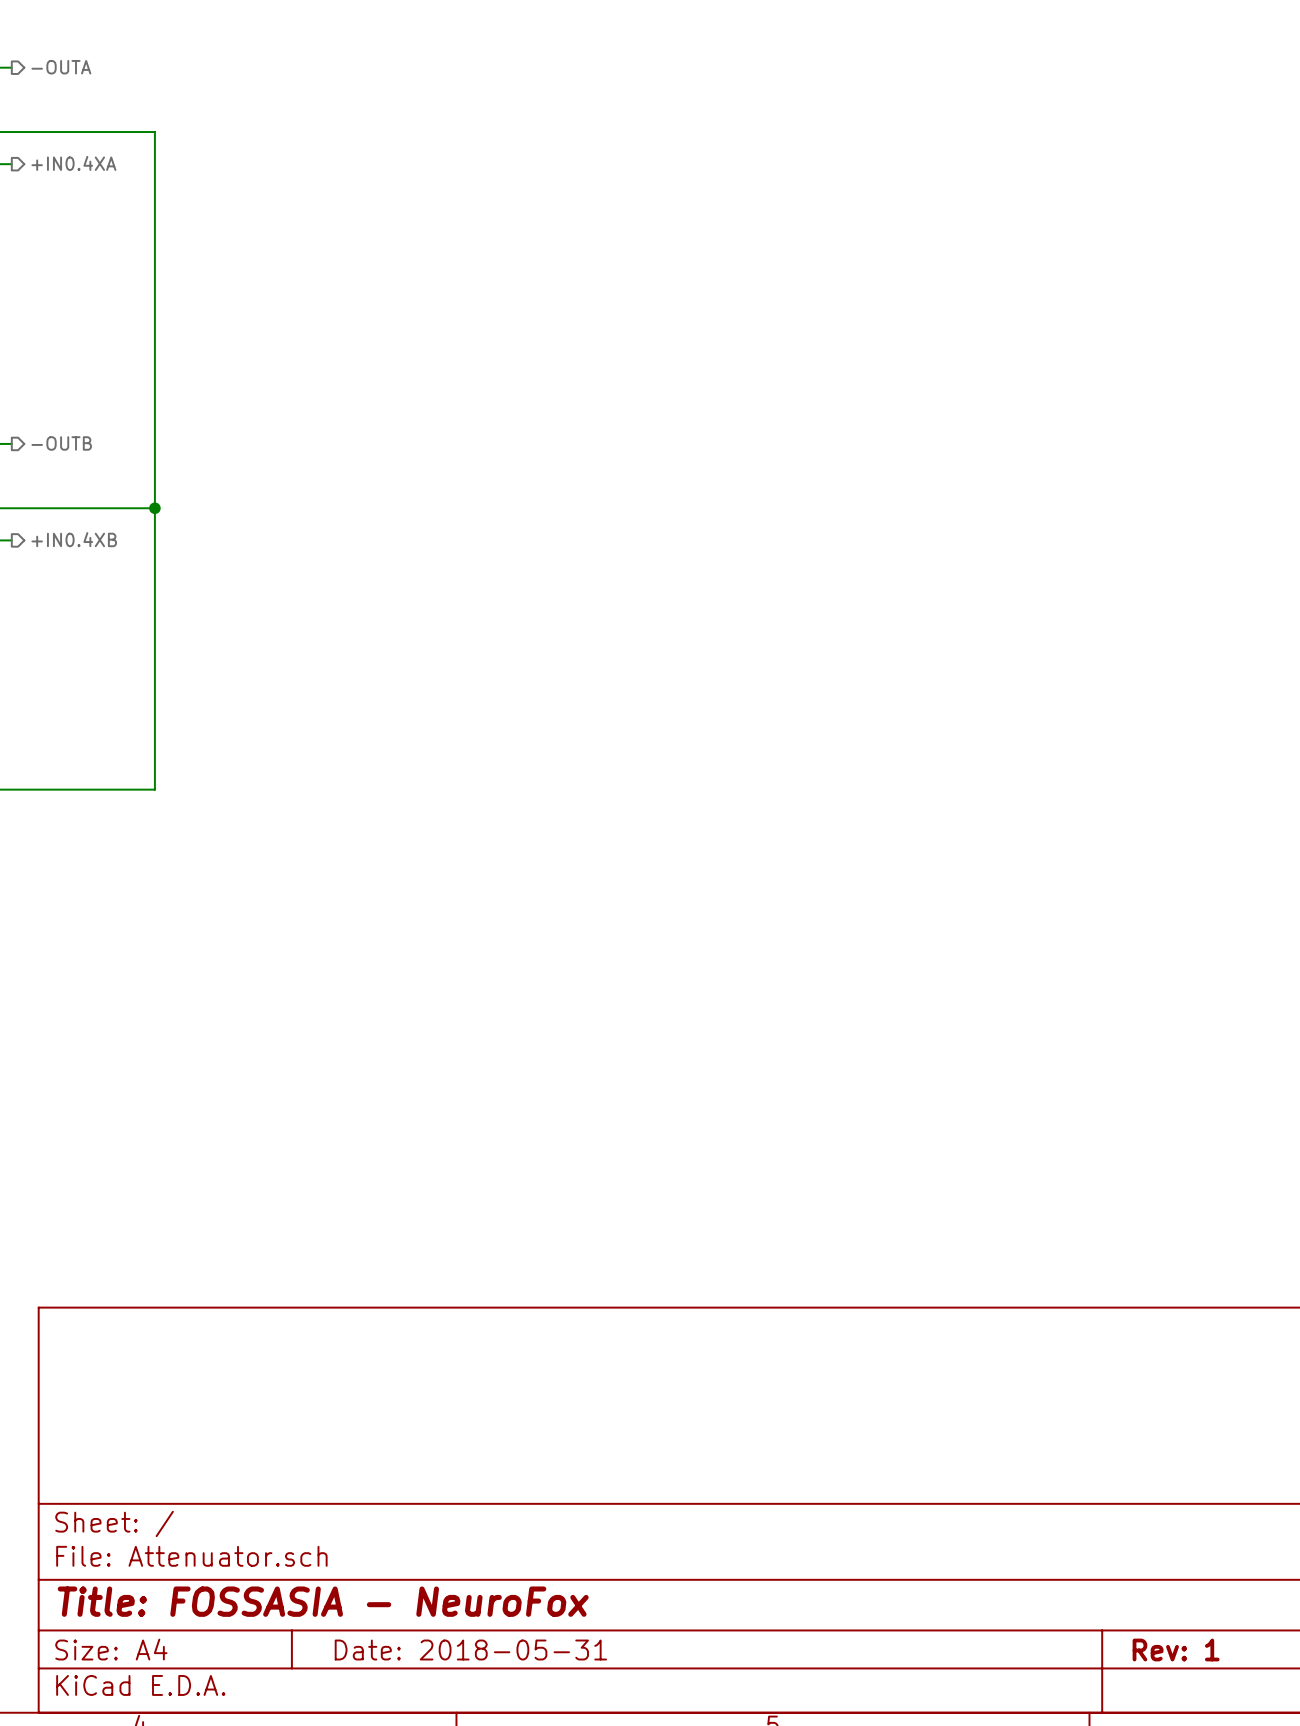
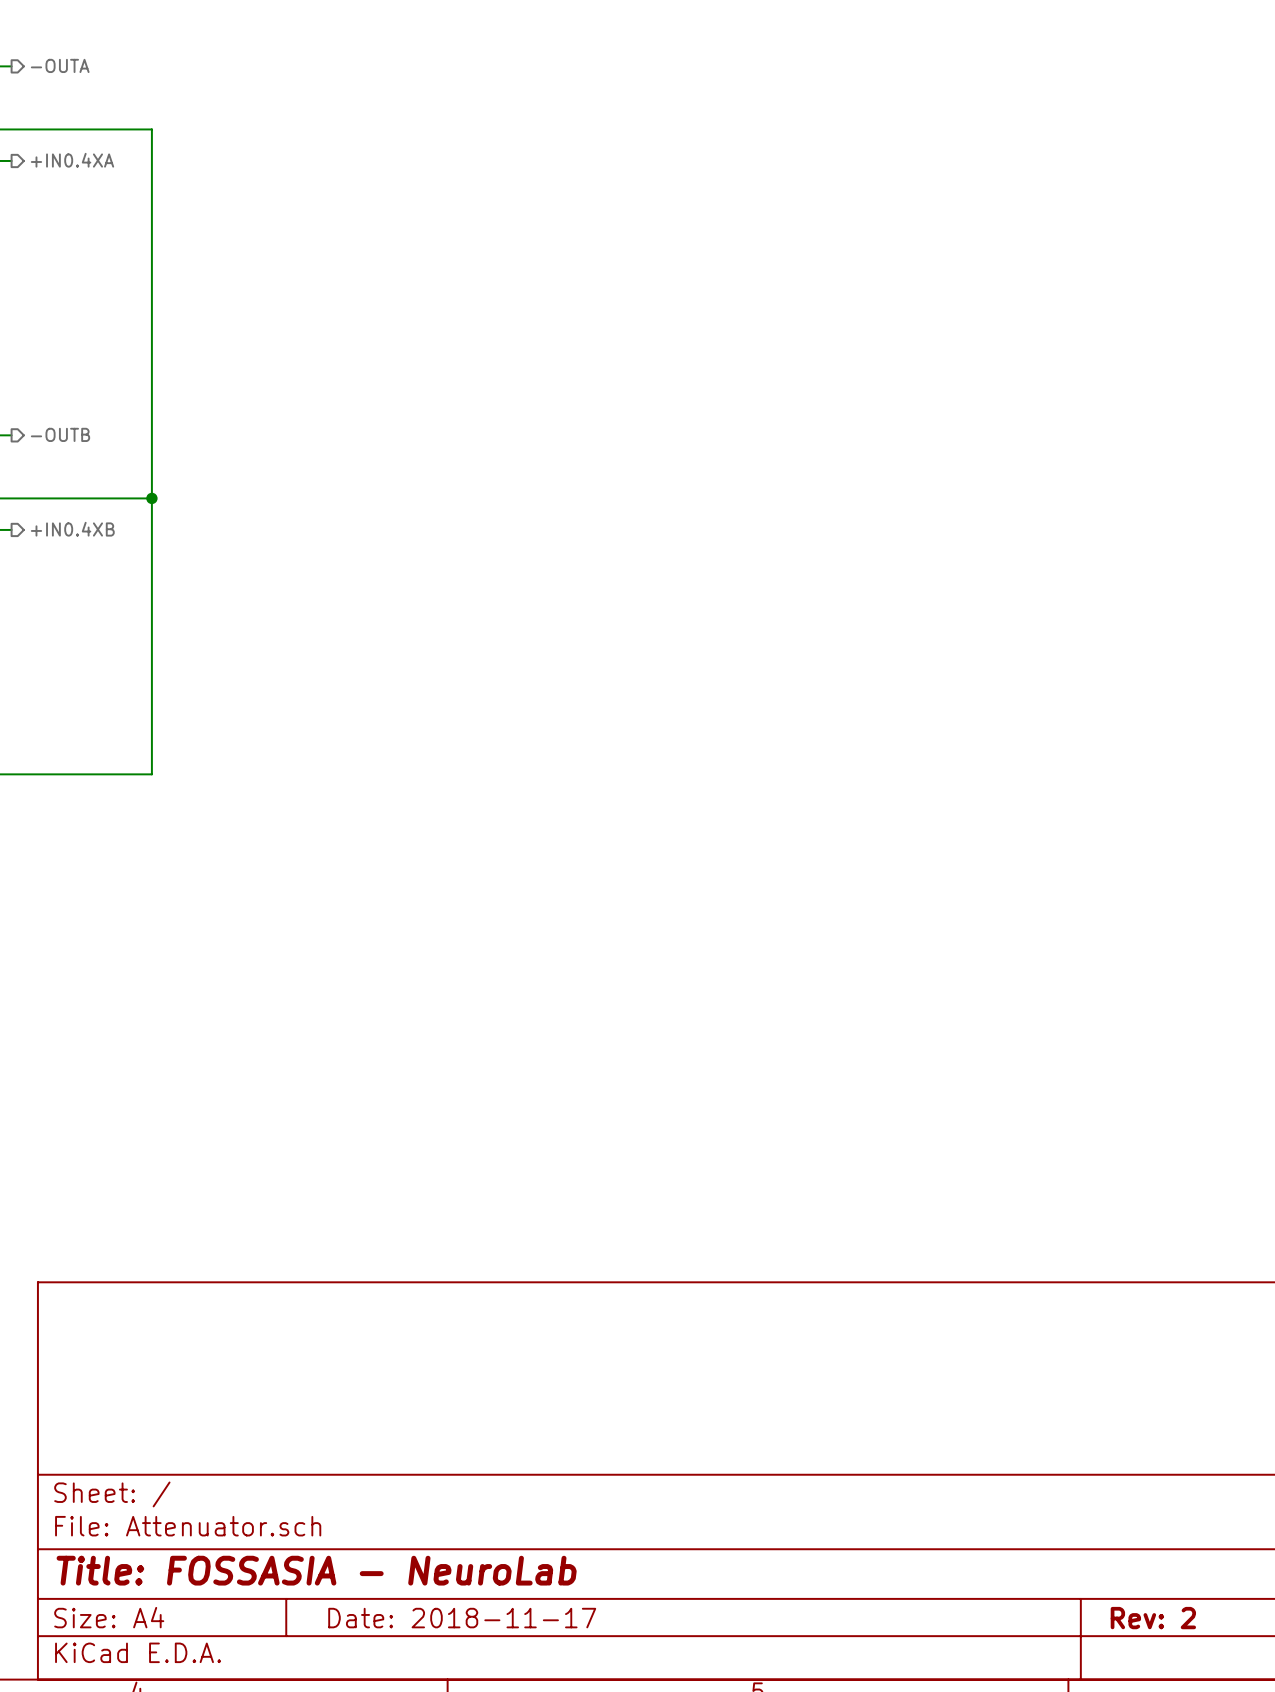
title block: Title: FOSSASIA - NeuroFox (323, 1601) -> Title: FOSSASIA - NeuroLab (316, 1570)
title block: Date: 2018-05-31 (470, 1650) -> Date: 2018-11-17 (462, 1618)
title block: Rev: 1 (1176, 1650) -> Rev: 2 (1153, 1618)

